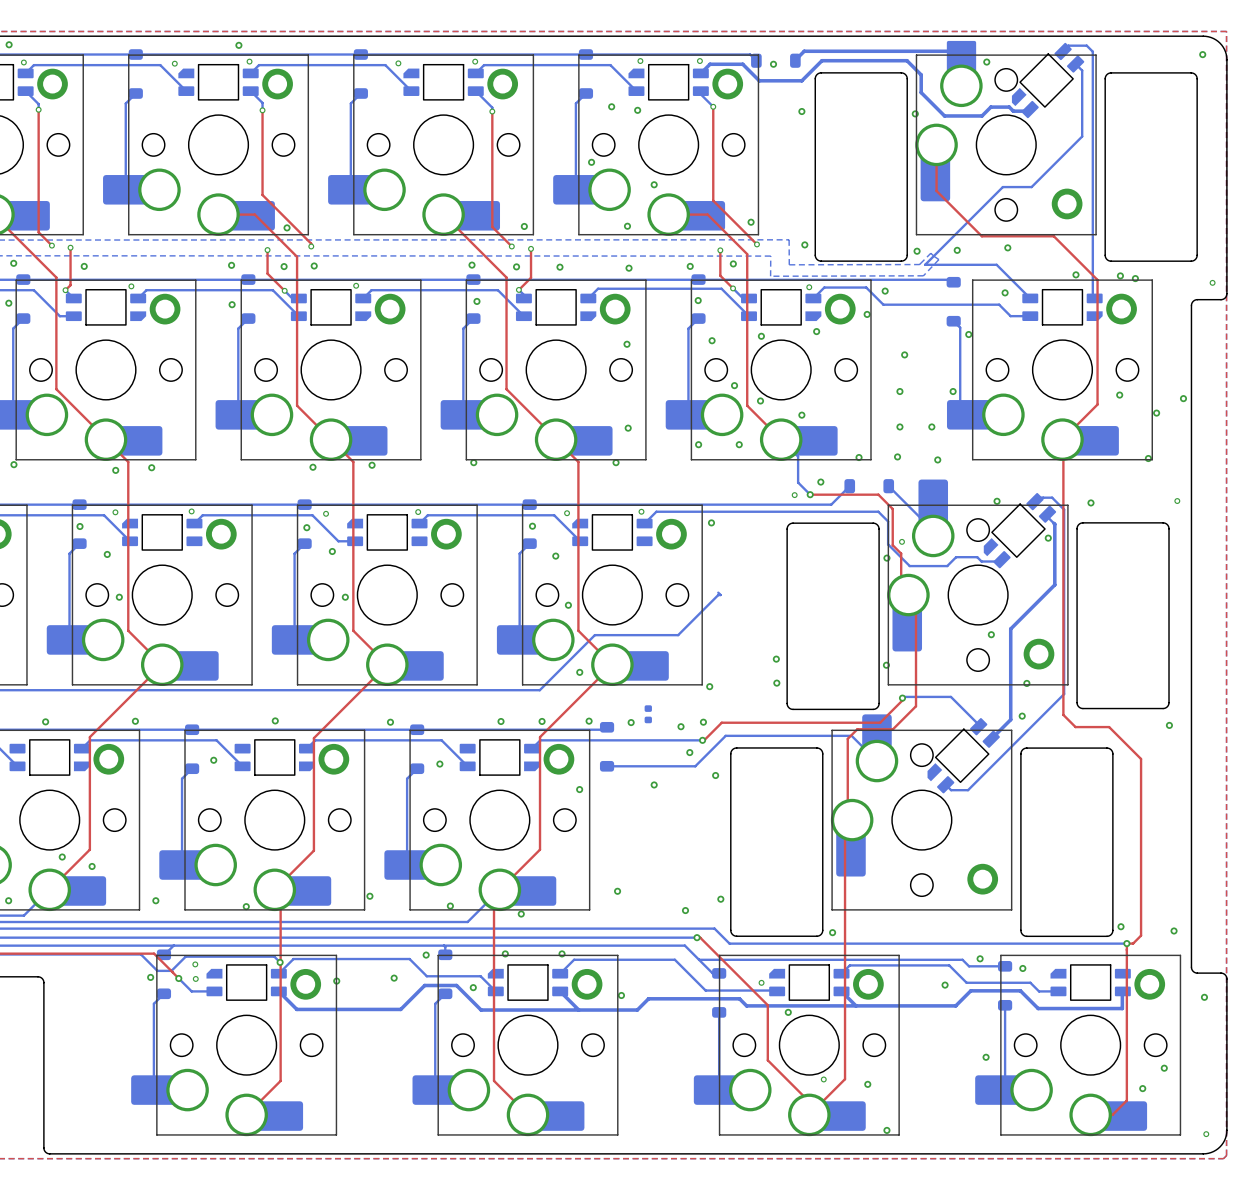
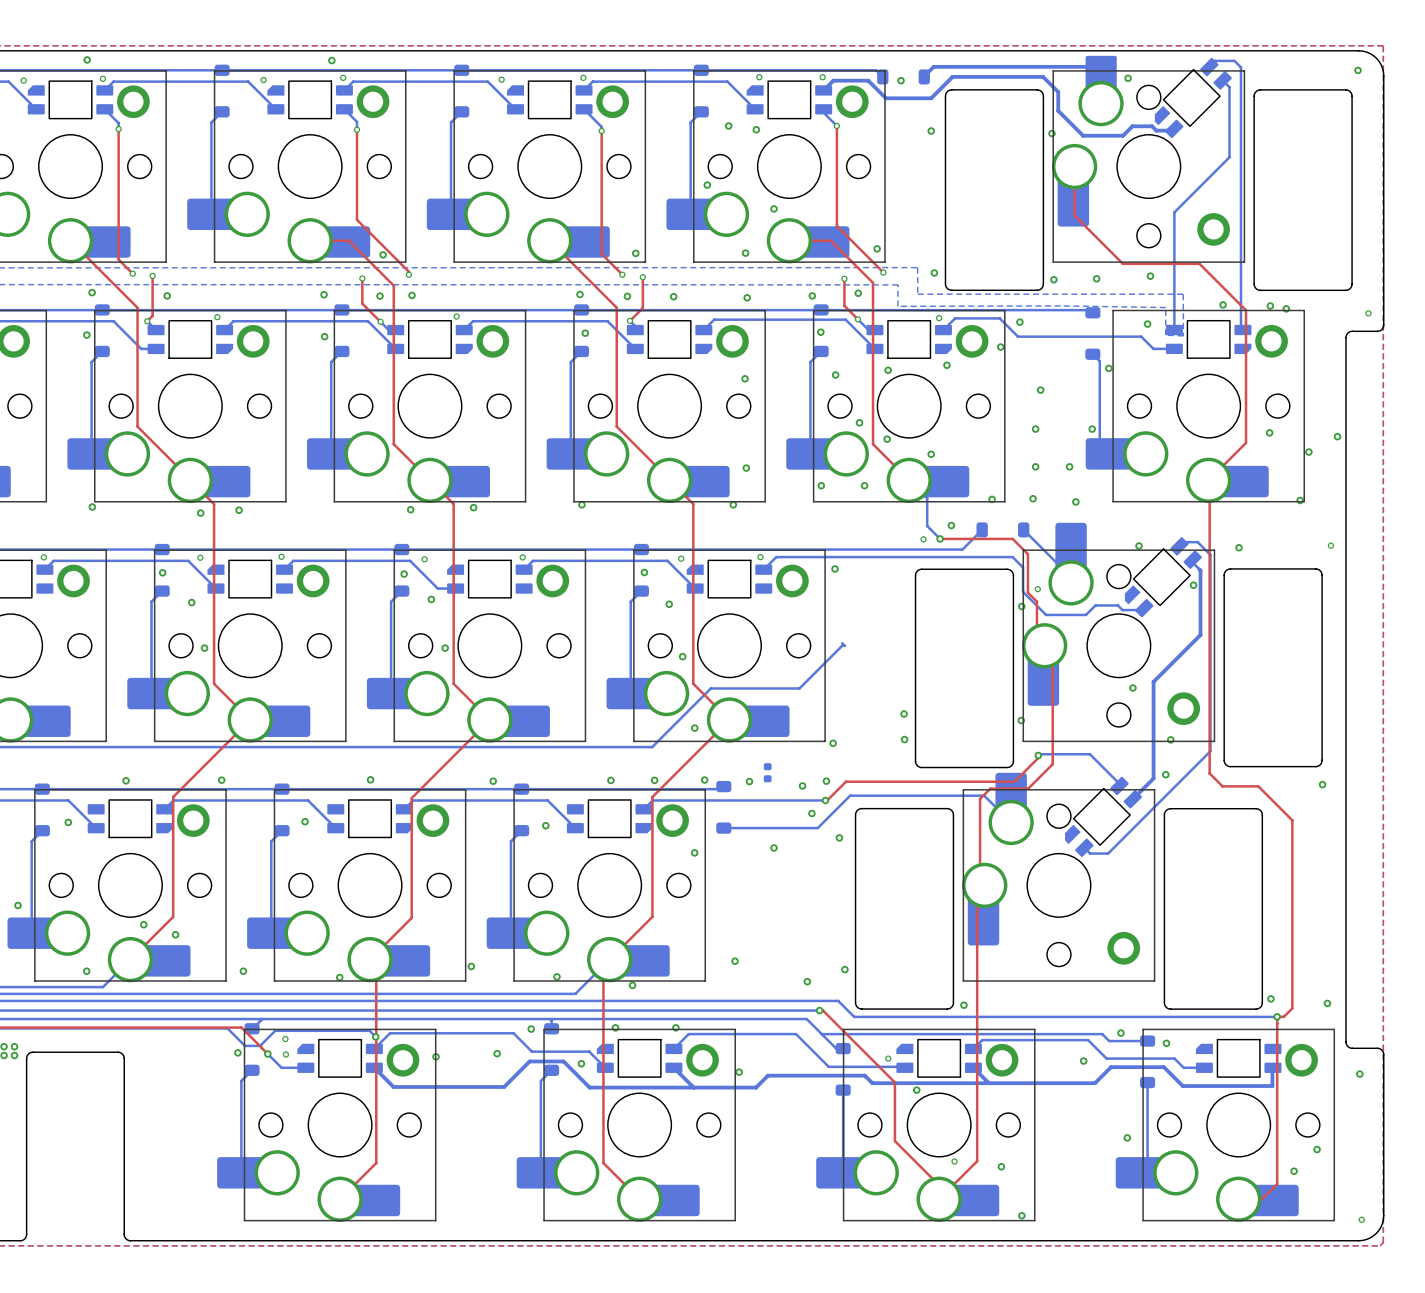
bottom track: (1082, 70) (1082, 136) (1031, 187) (1002, 187) (925, 264) (996, 264) (1030, 298) -> (1229, 87) (1229, 157) (1174, 212) (1174, 329)
bottom zone outline: (789, 264) (919, 264) (930, 253) (938, 259) (923, 275) -> (917, 294) (1183, 294) (1183, 335) (1165, 335) (1165, 307) (1060, 305)

